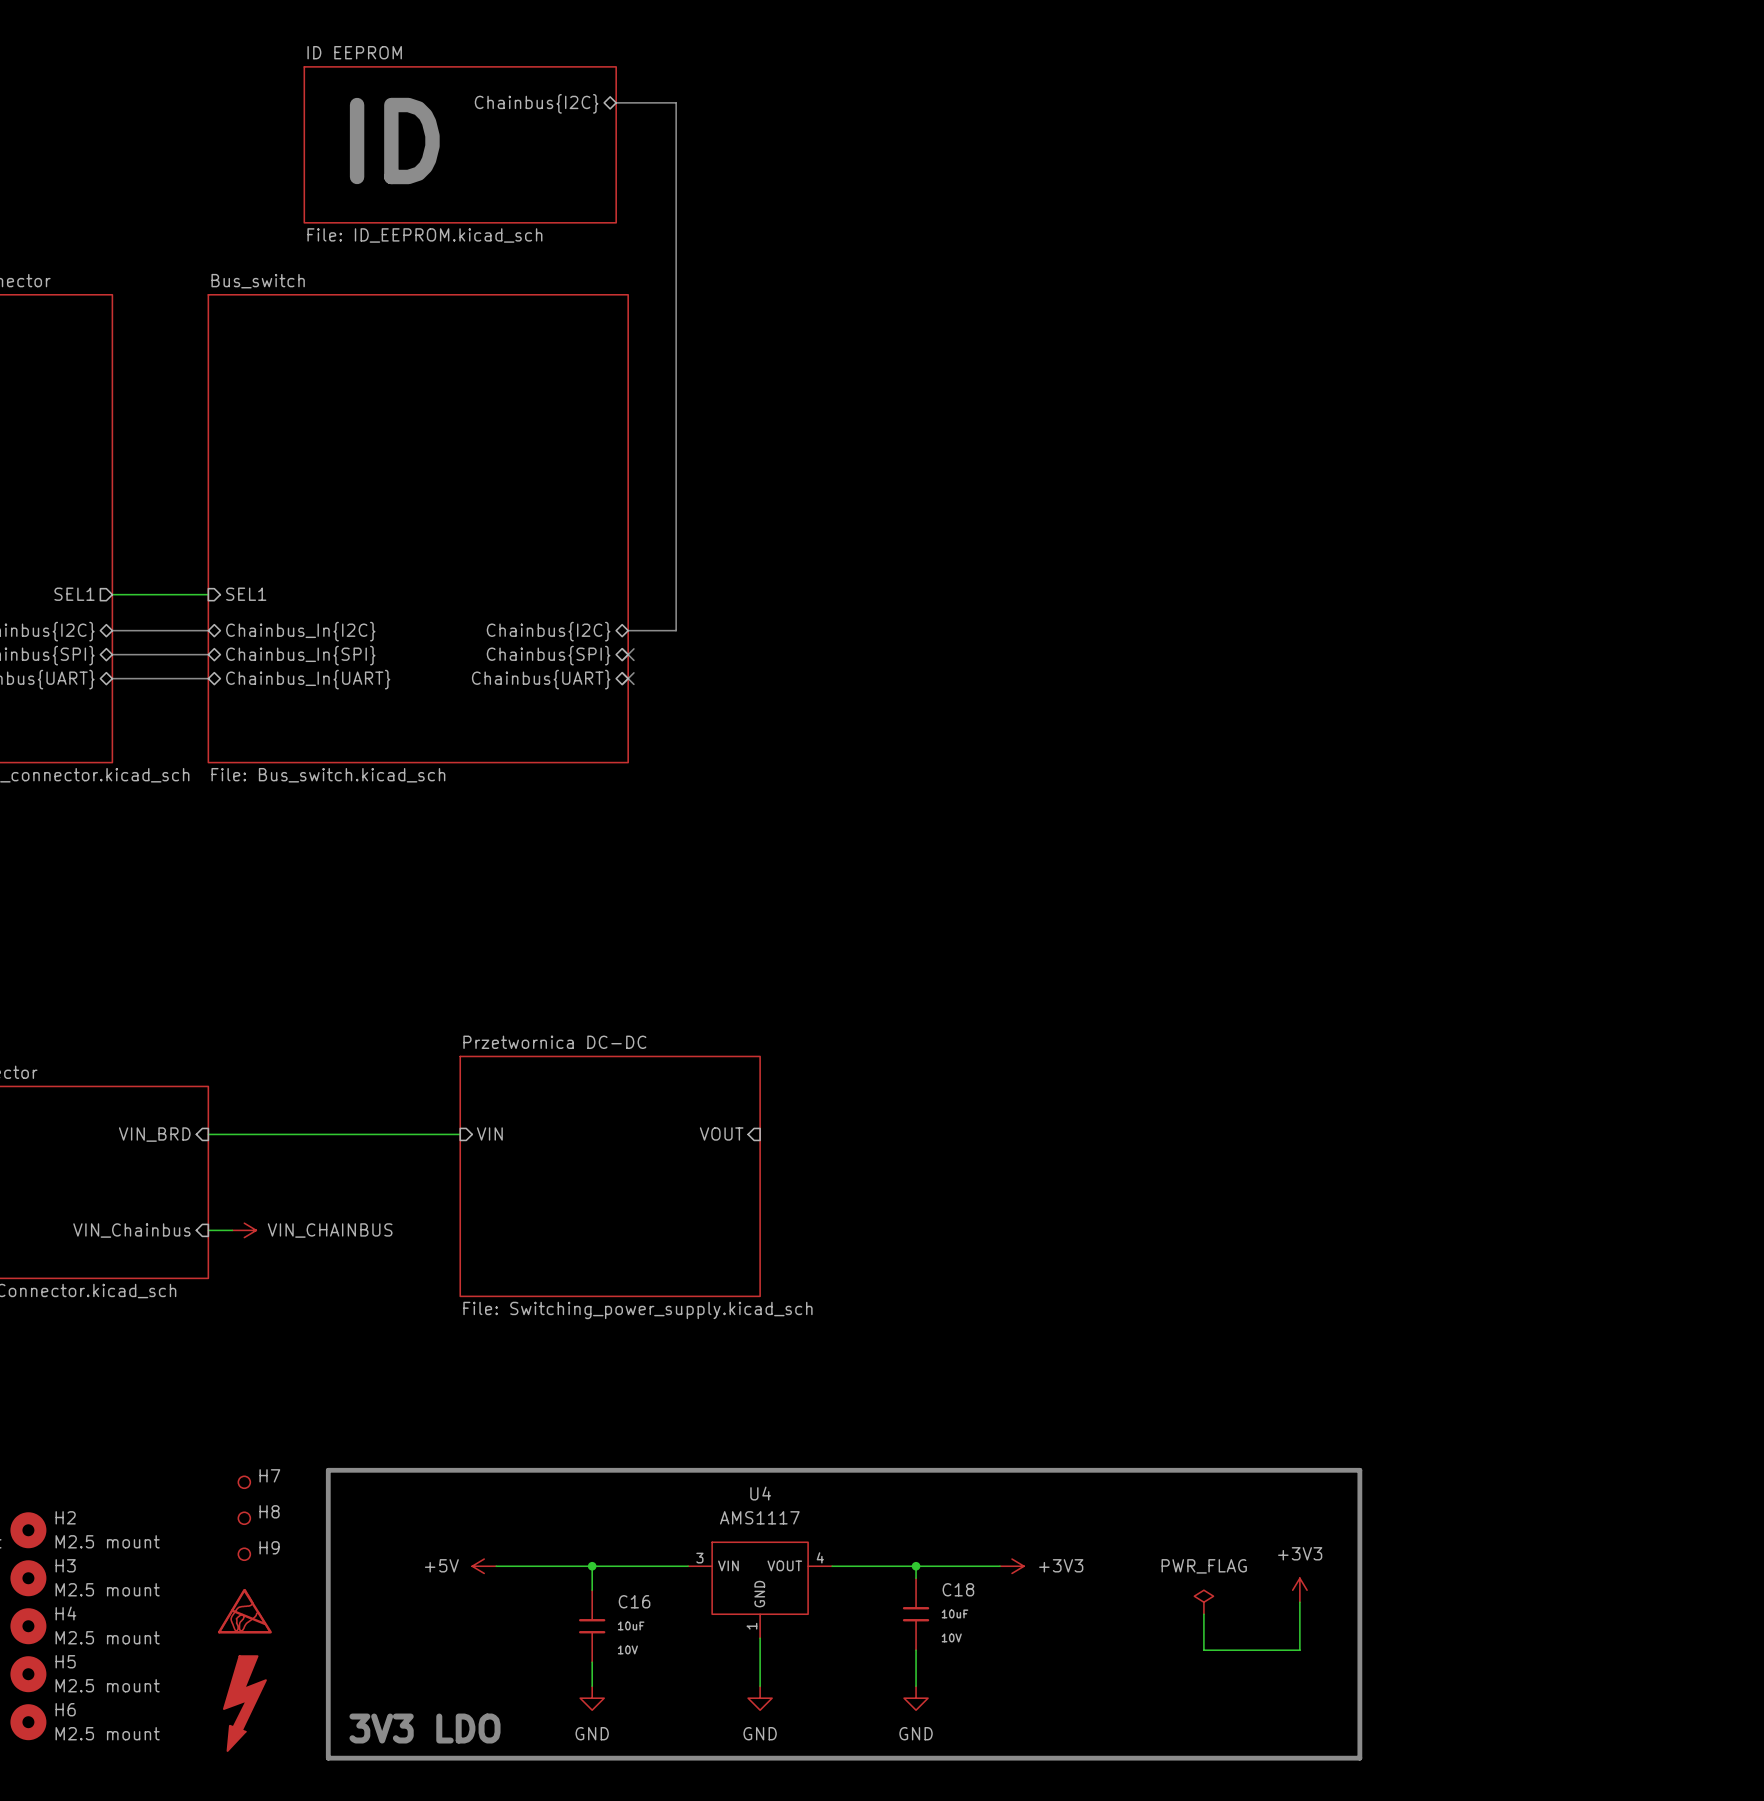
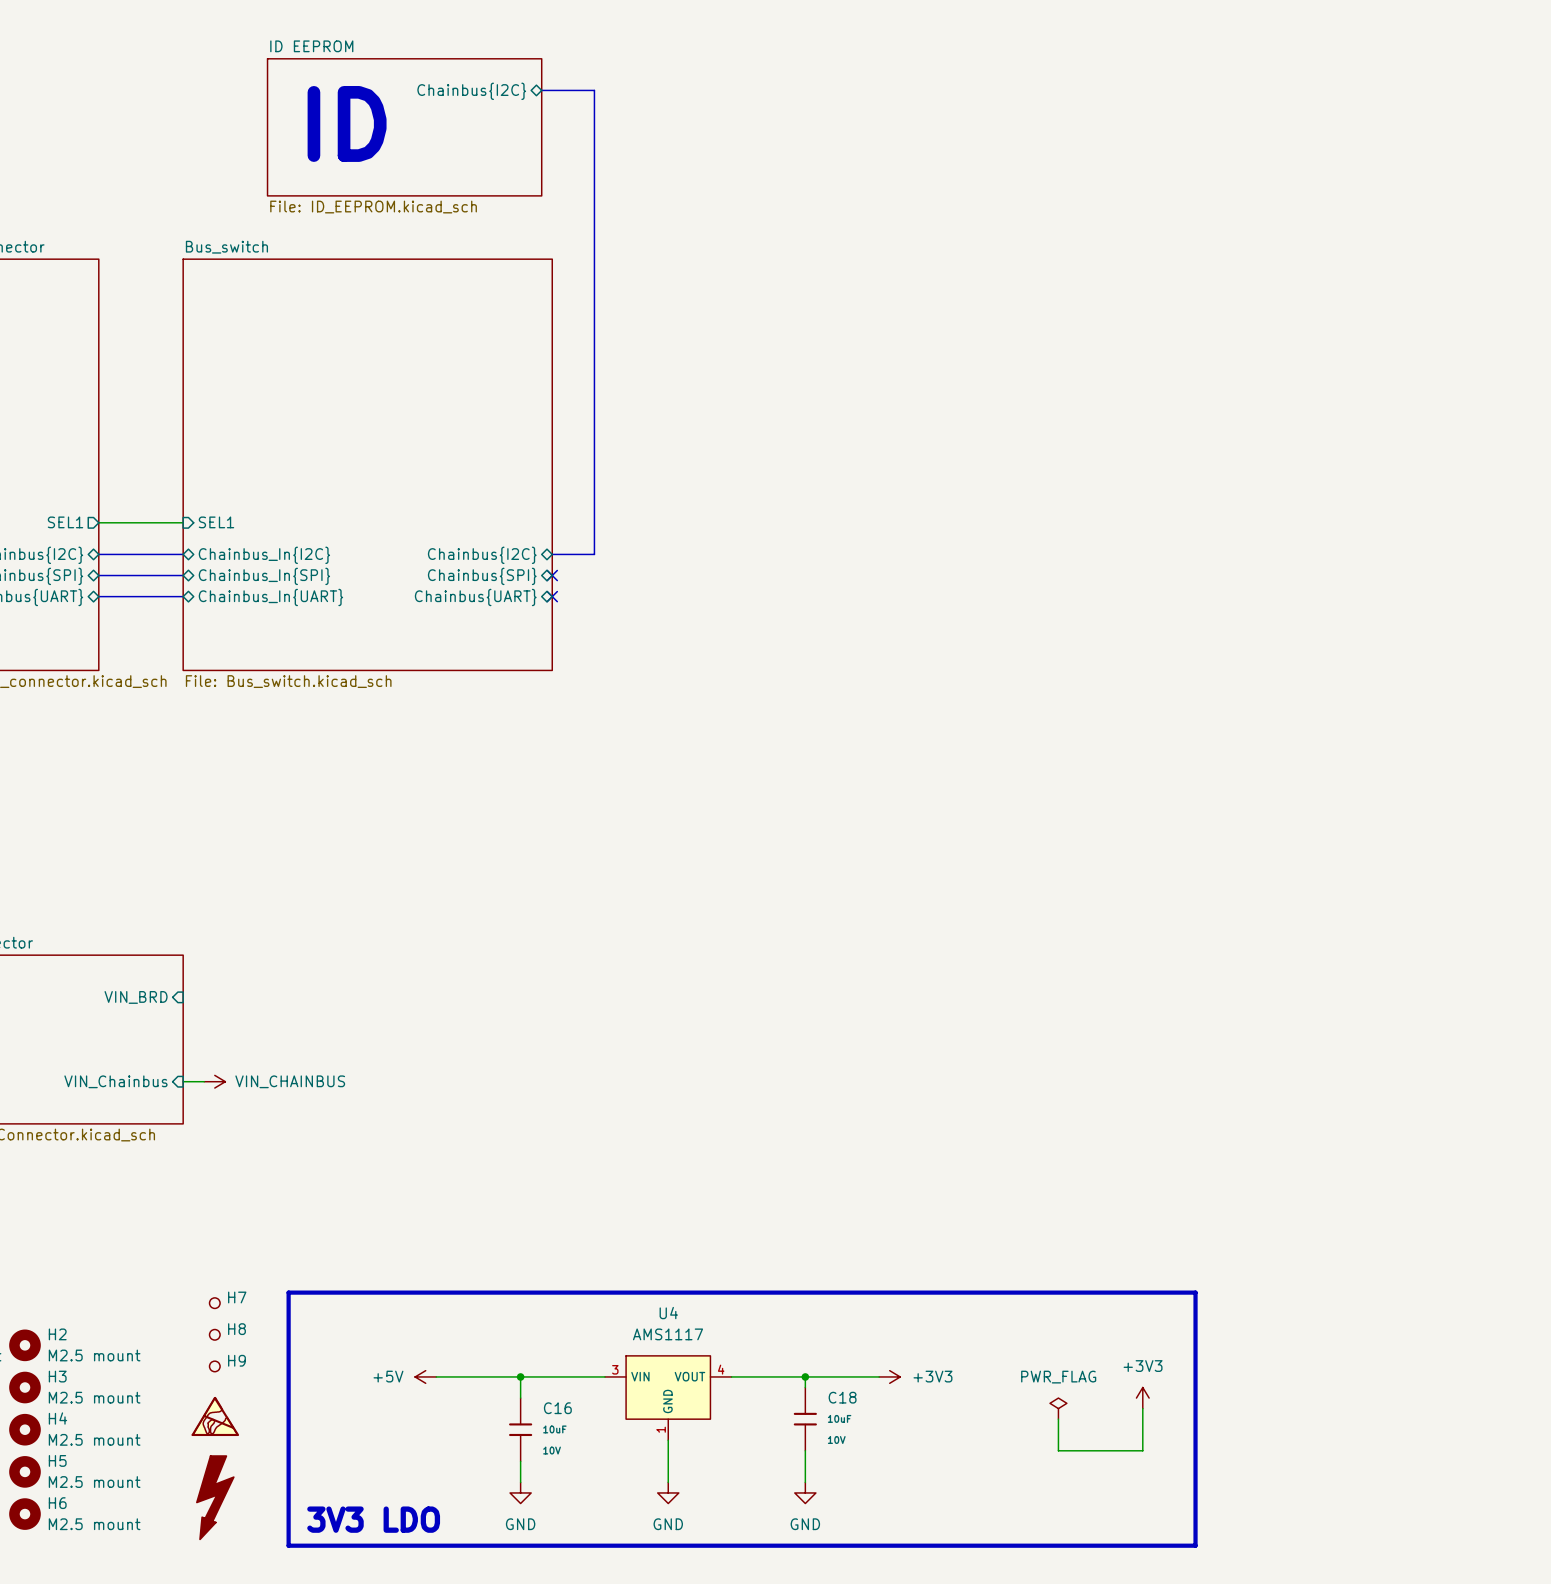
sheet pin: VIN (489, 1133) -> none
sheet pin: VOUT (721, 1133) -> none
wire: (208, 1134) (460, 1134) -> none
sheet Przetwornica DC-DC: File: Switching_power_supply.kicad_sch (610, 1176) -> none

